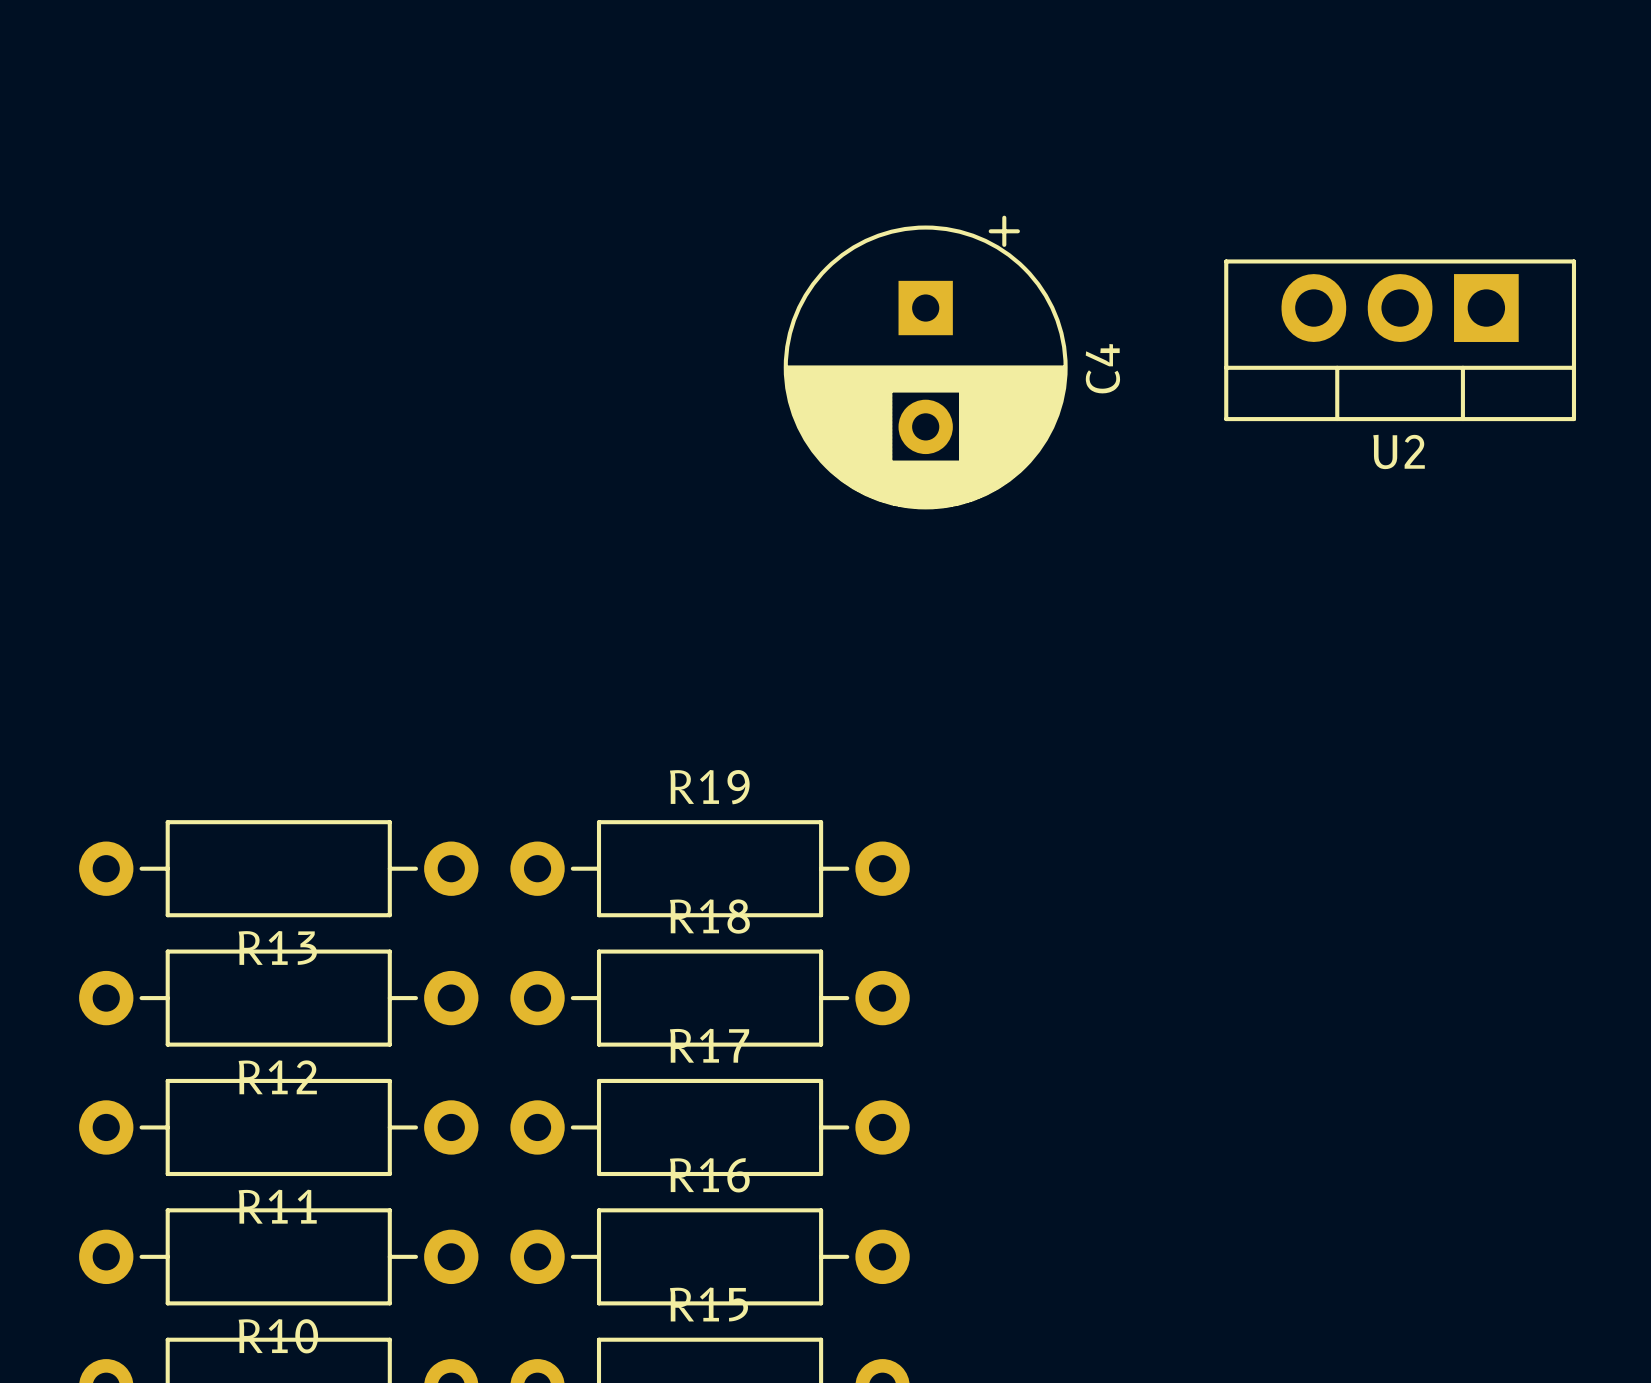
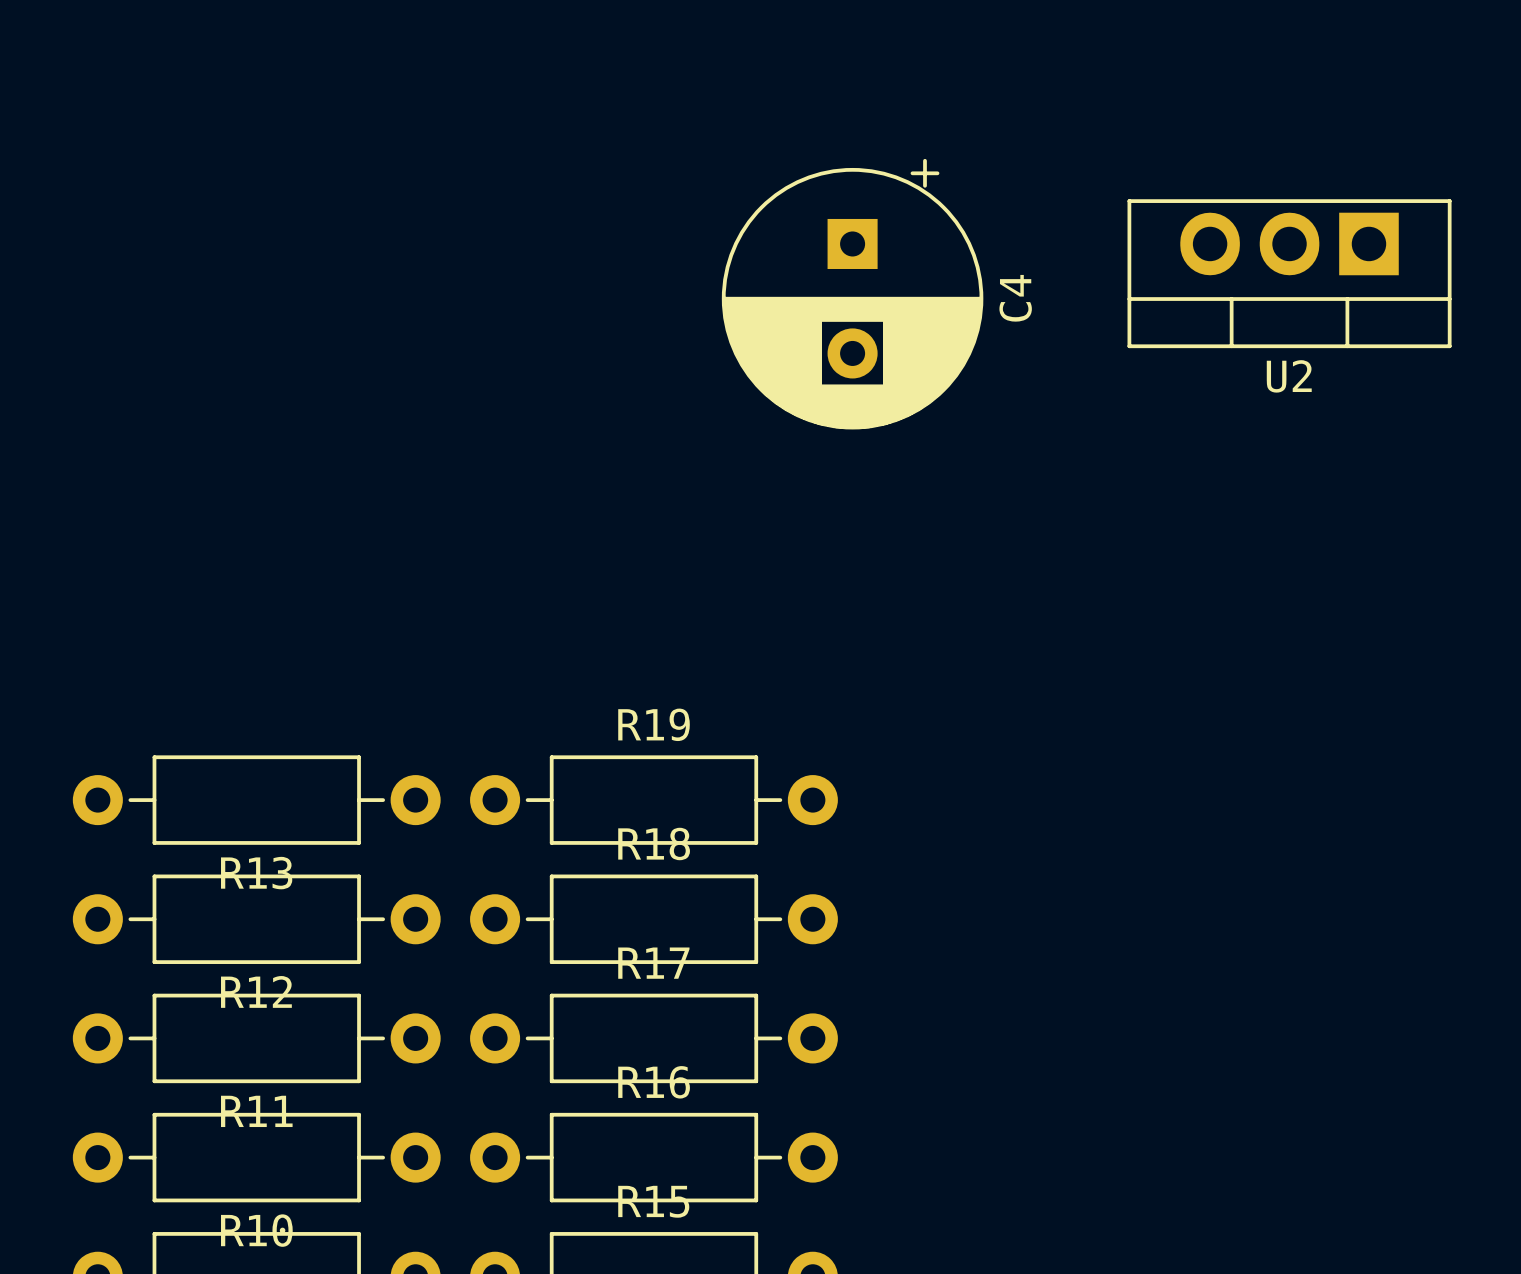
U2 position: (1400, 340) -> (1289, 273)
C4 position: (925, 362) -> (852, 294)

